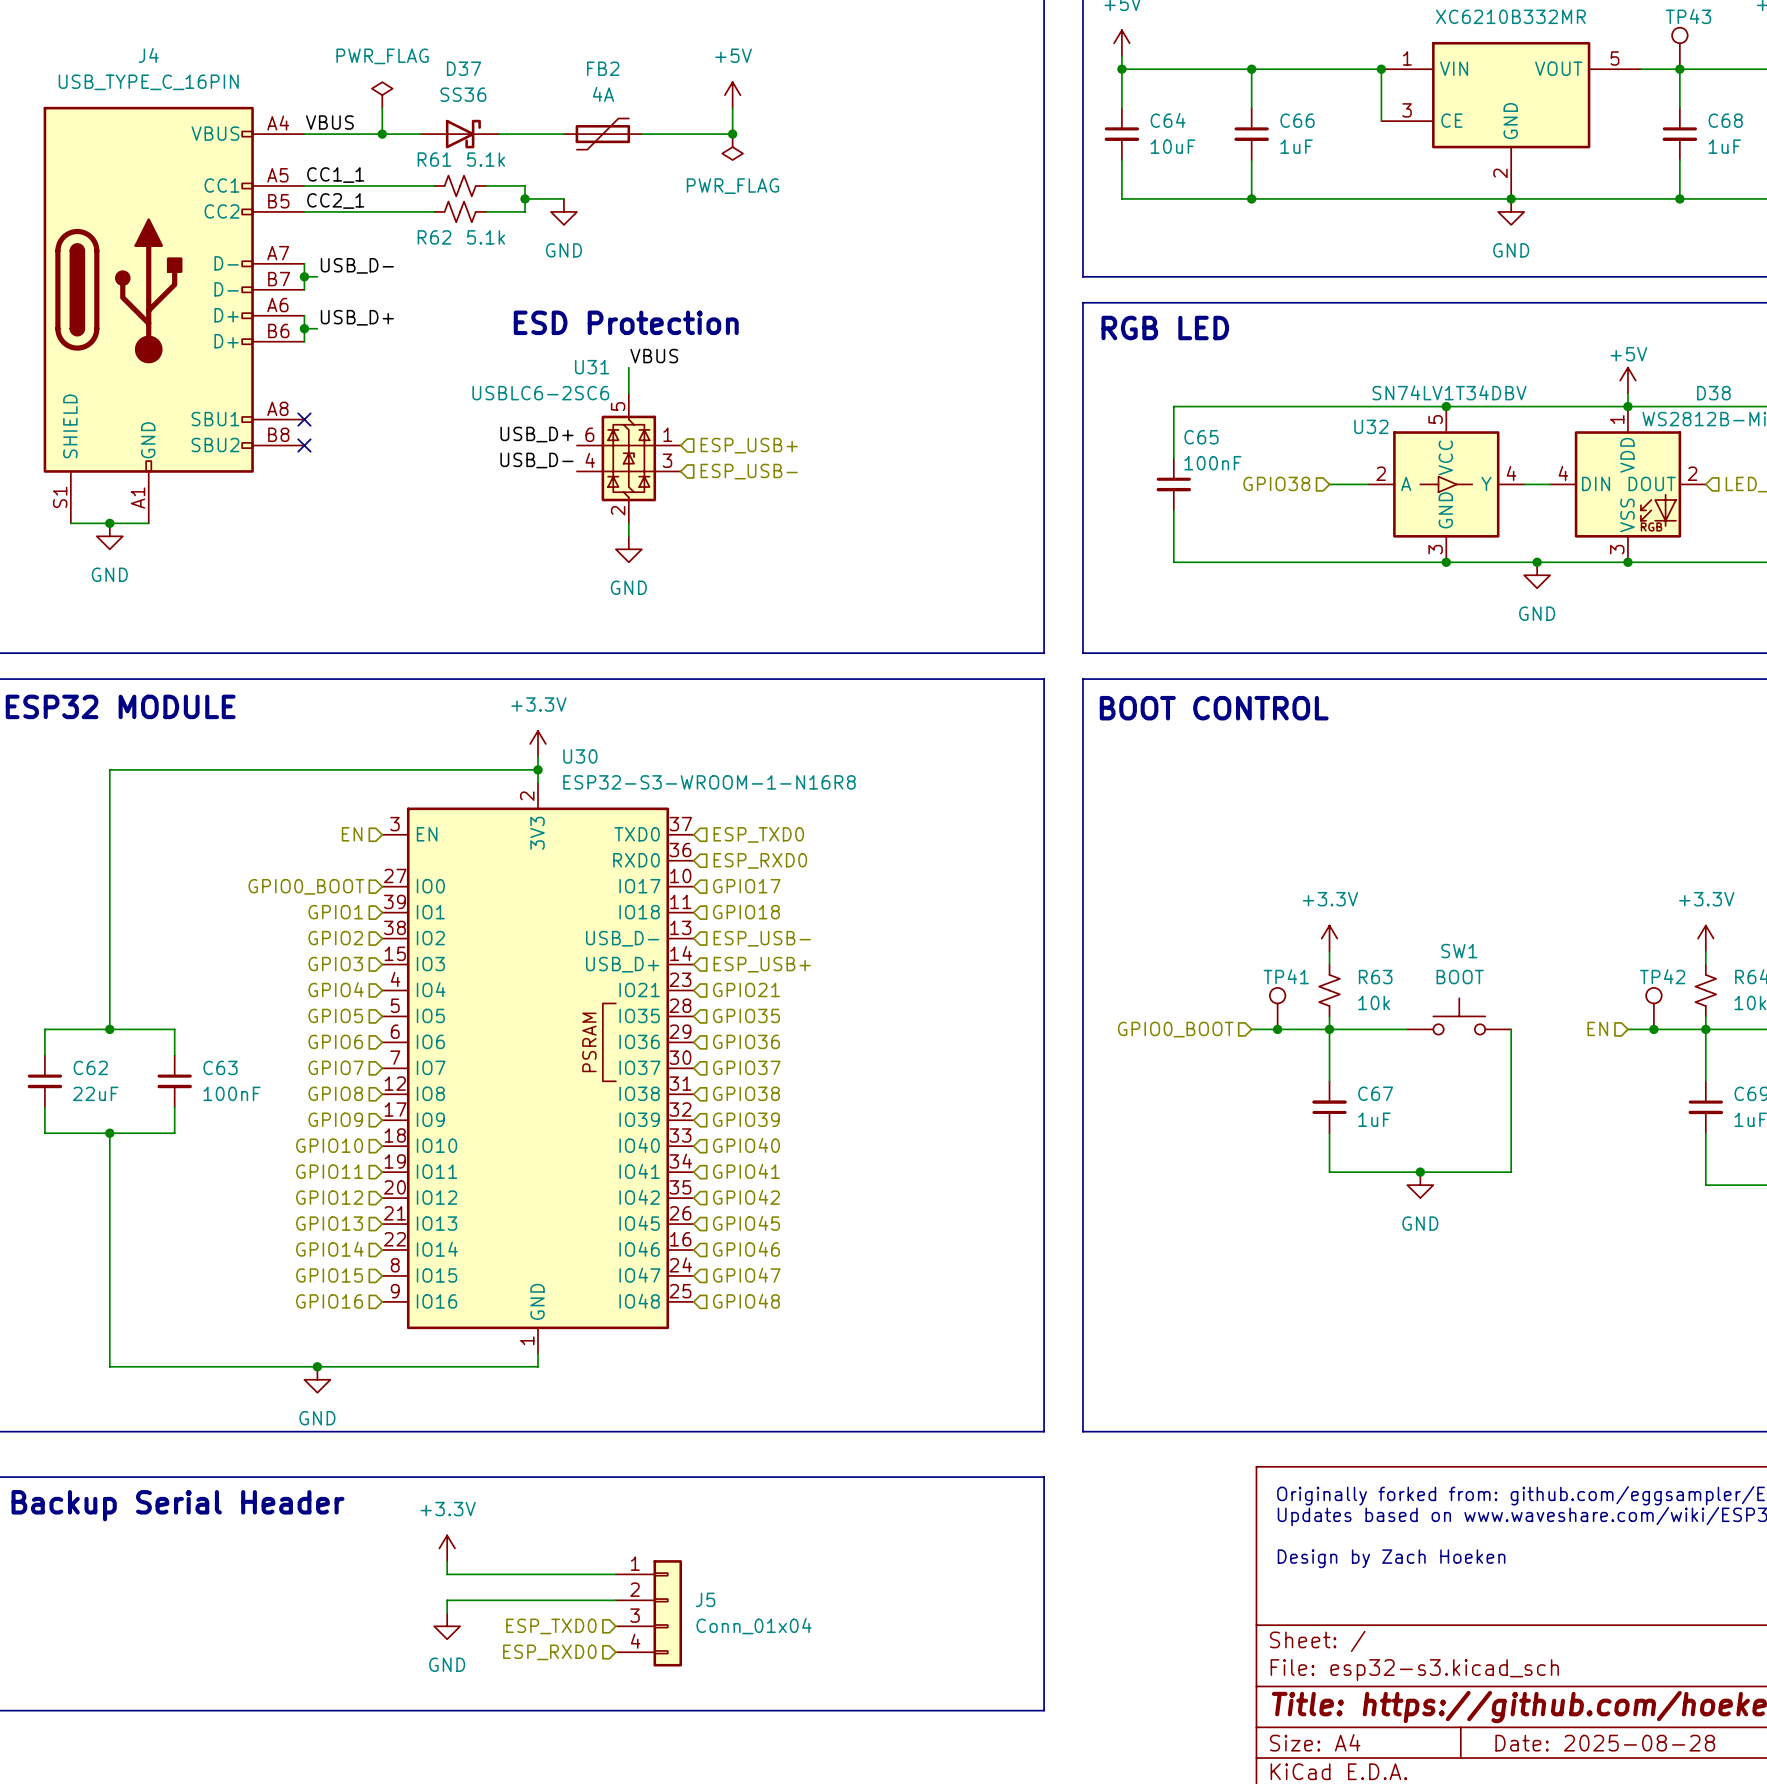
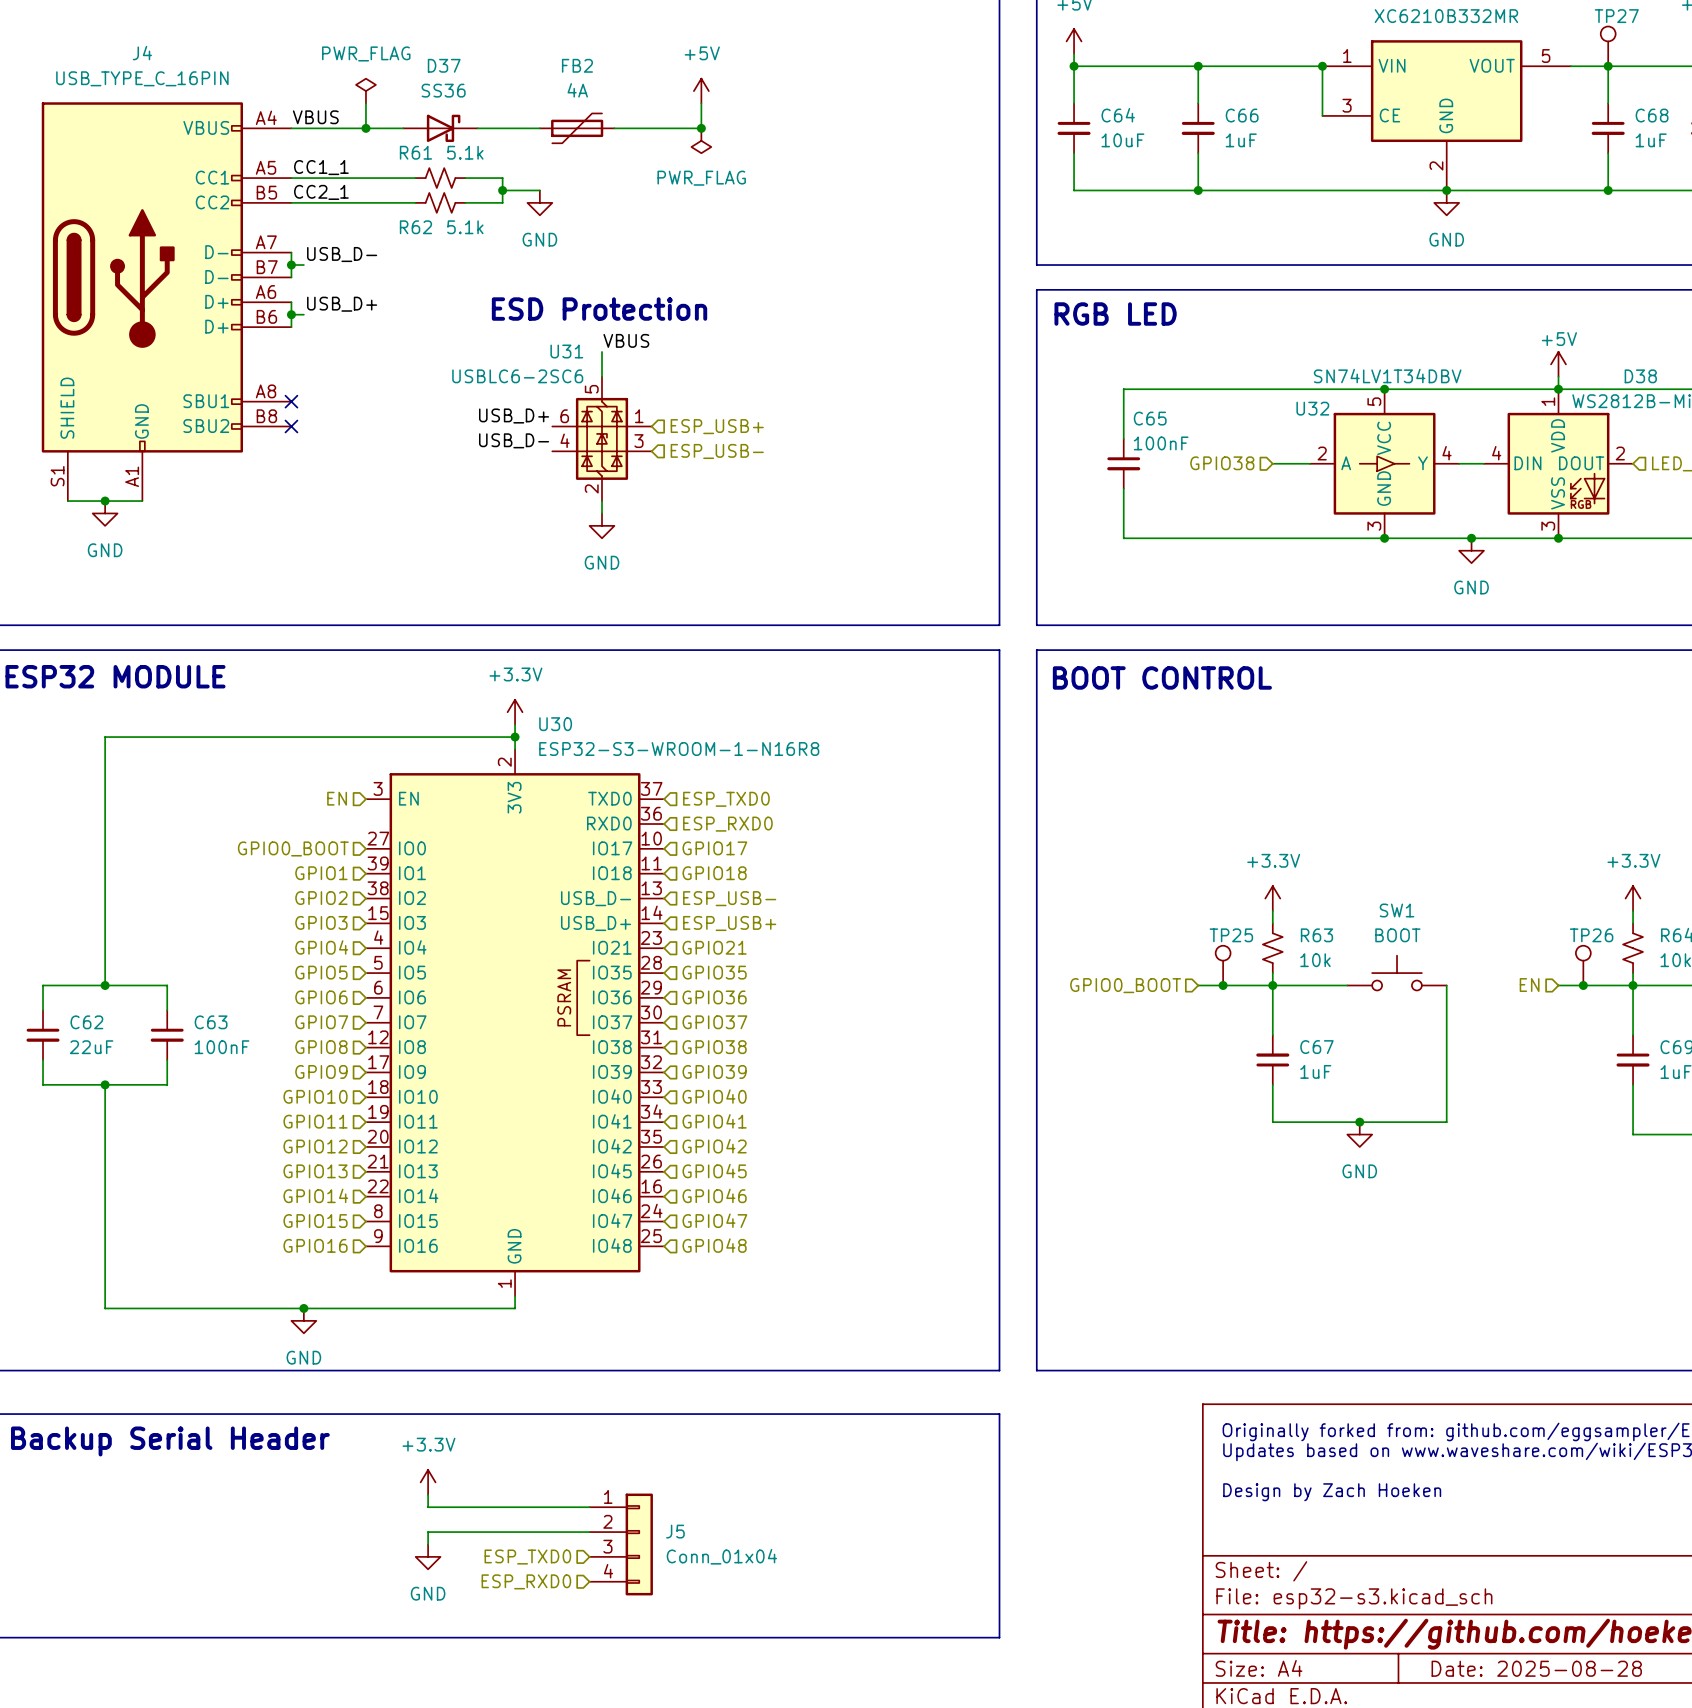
TP43 name: TP43 (1688, 16) -> TP27 (1616, 16)
TP41 name: TP41 (1286, 976) -> TP25 (1231, 935)
TP42 name: TP42 (1662, 976) -> TP26 (1591, 935)

